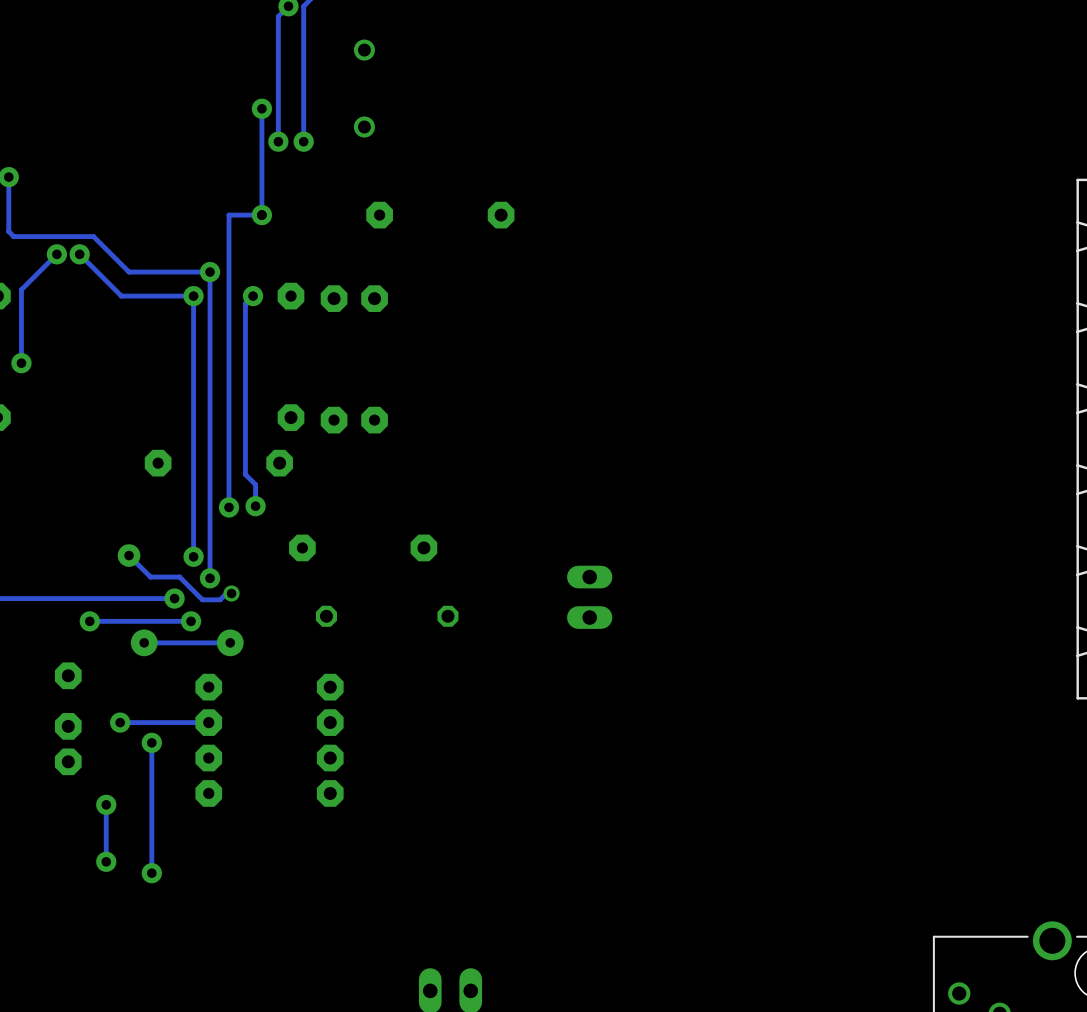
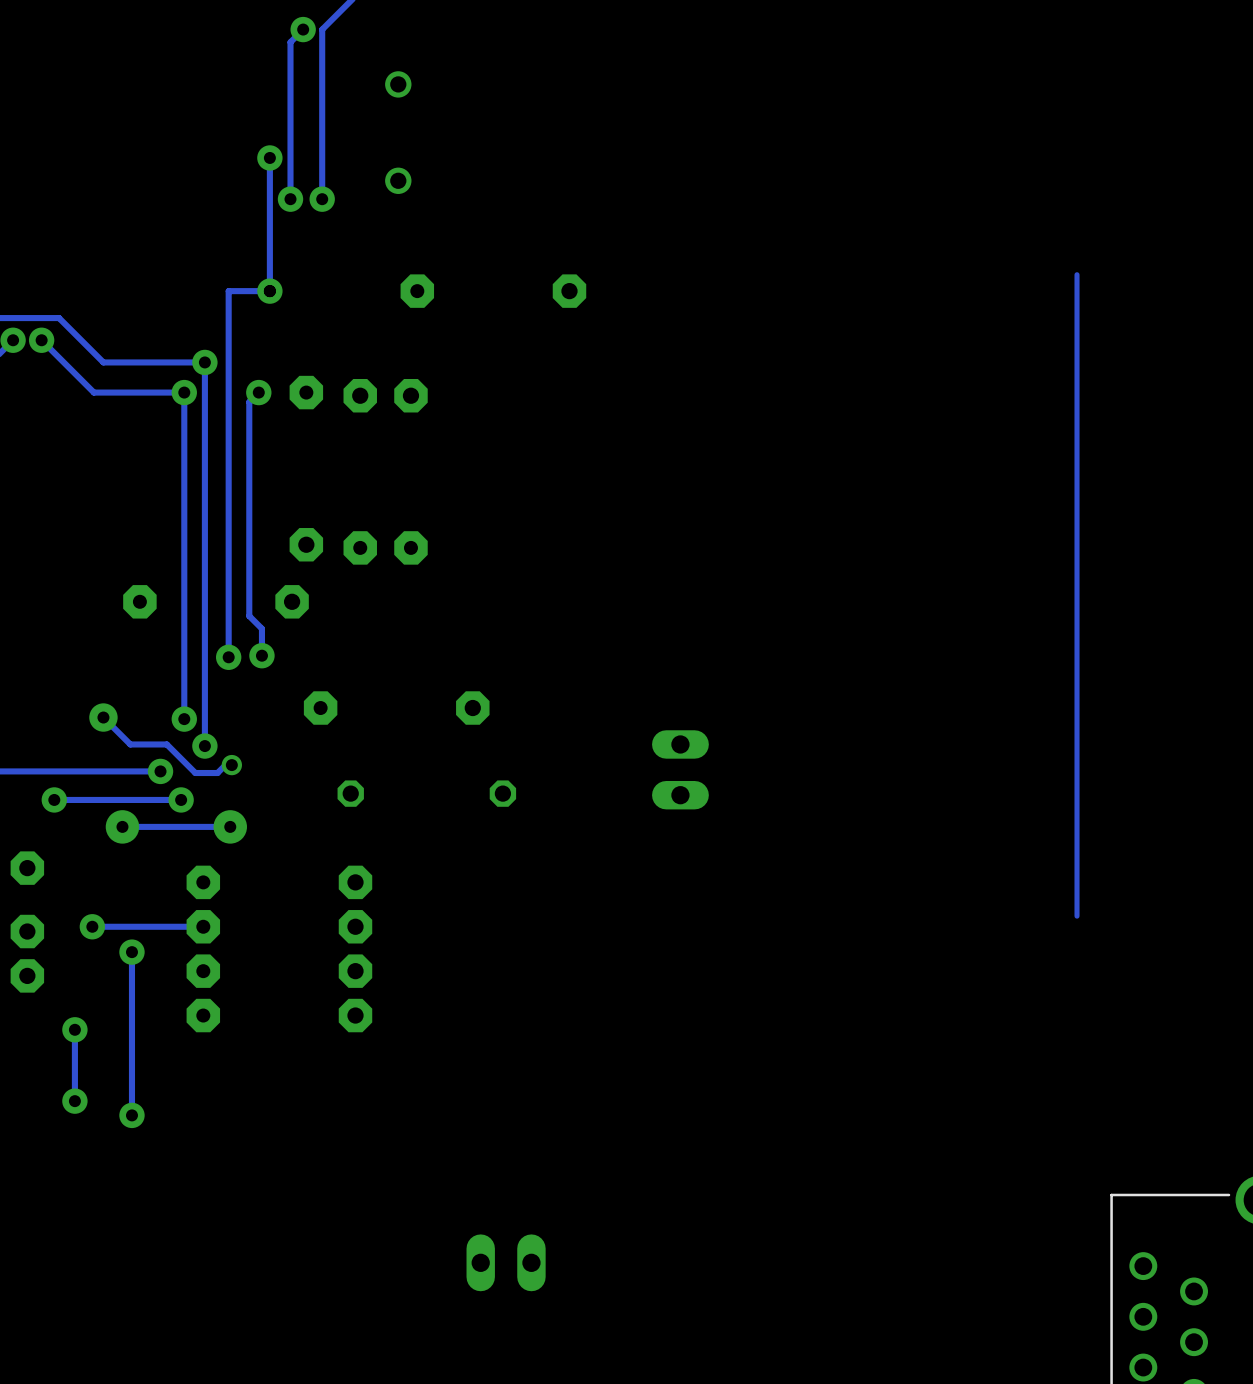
track: none -> (1077, 274) (1077, 916)

